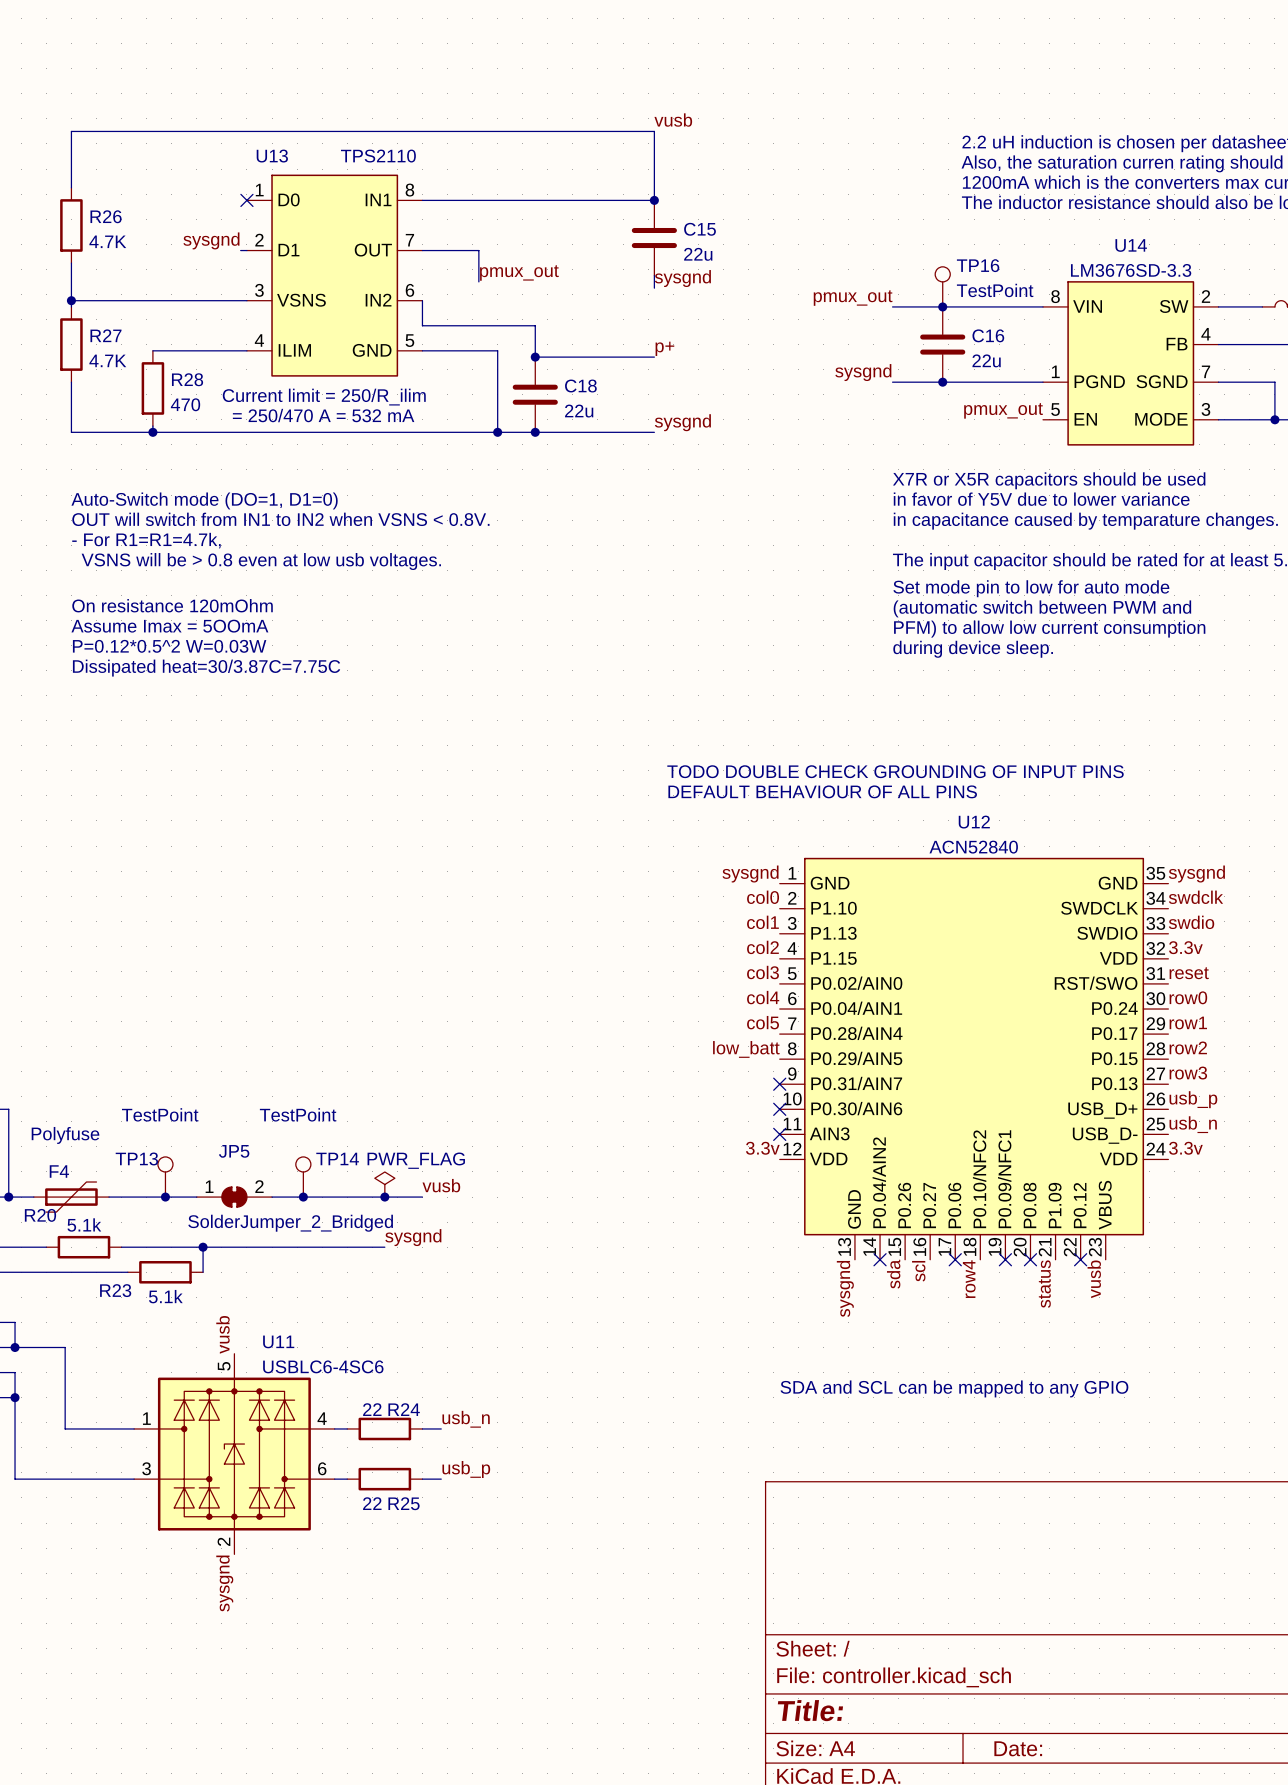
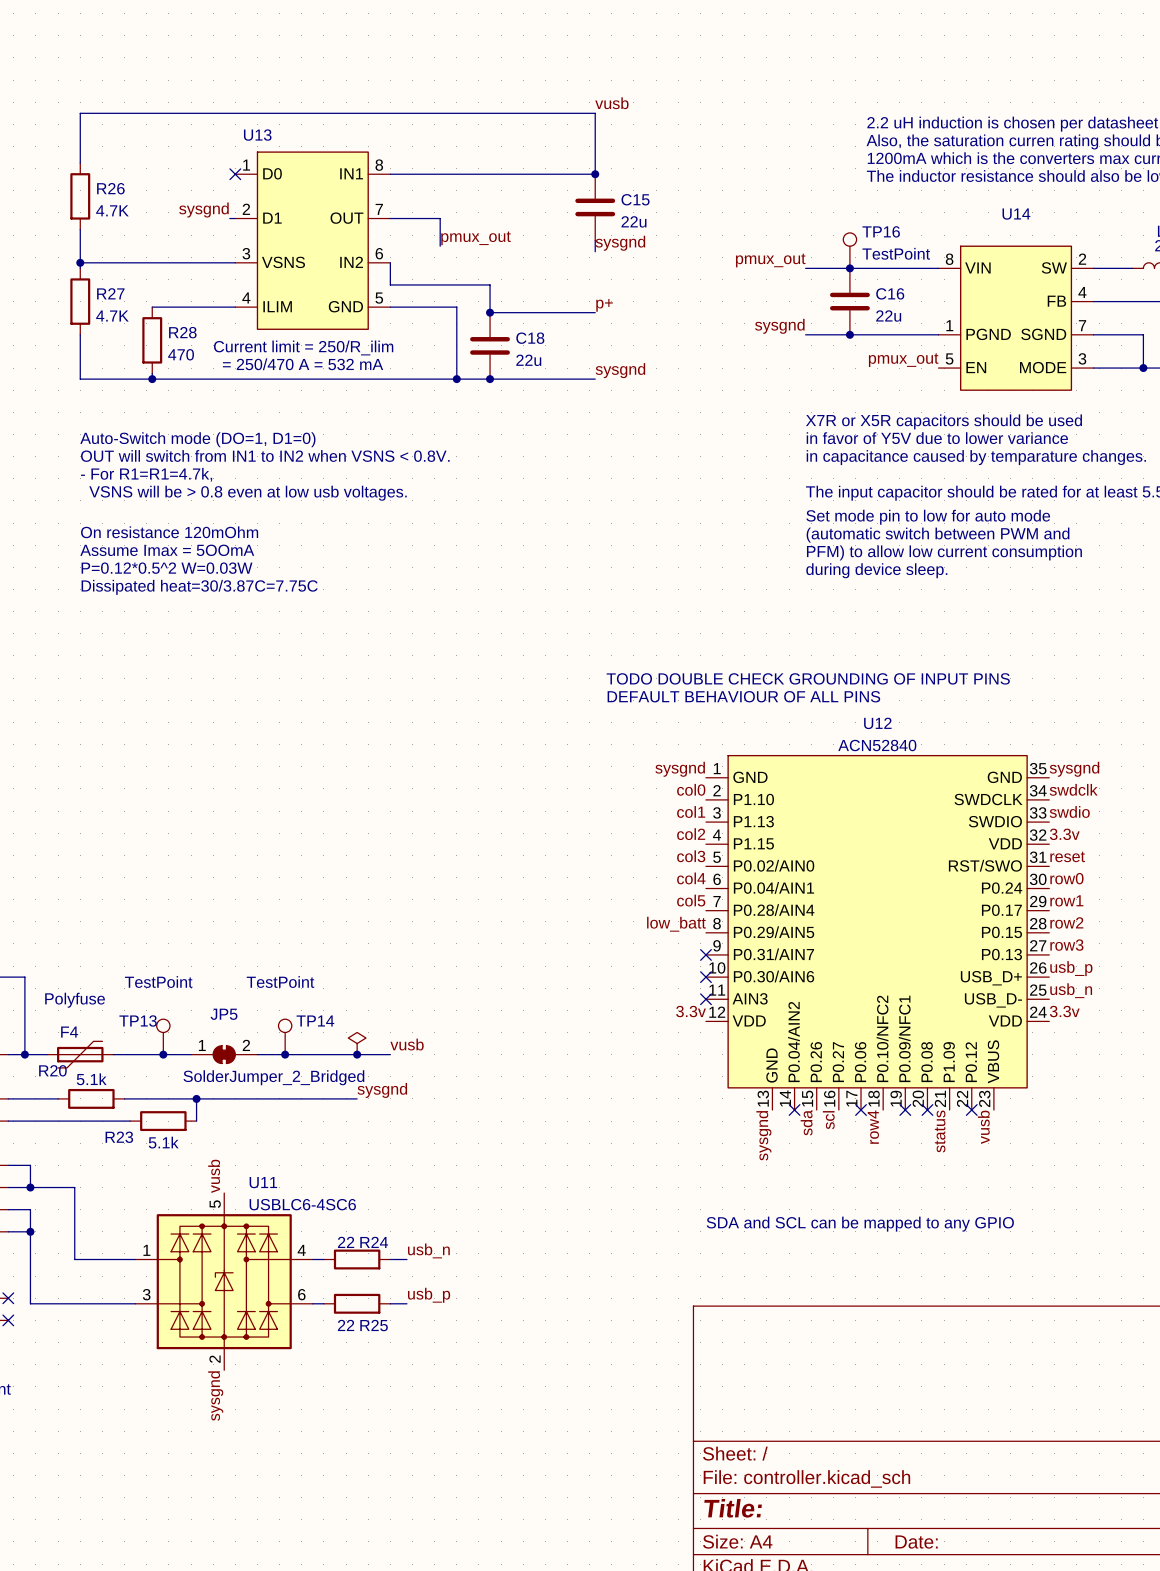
U13 value: TPS2110 (378, 156) -> none
U14 value: LM3676SD-3.3 (1131, 270) -> none
power symbol text: PWR_FLAG (416, 1160) -> none

